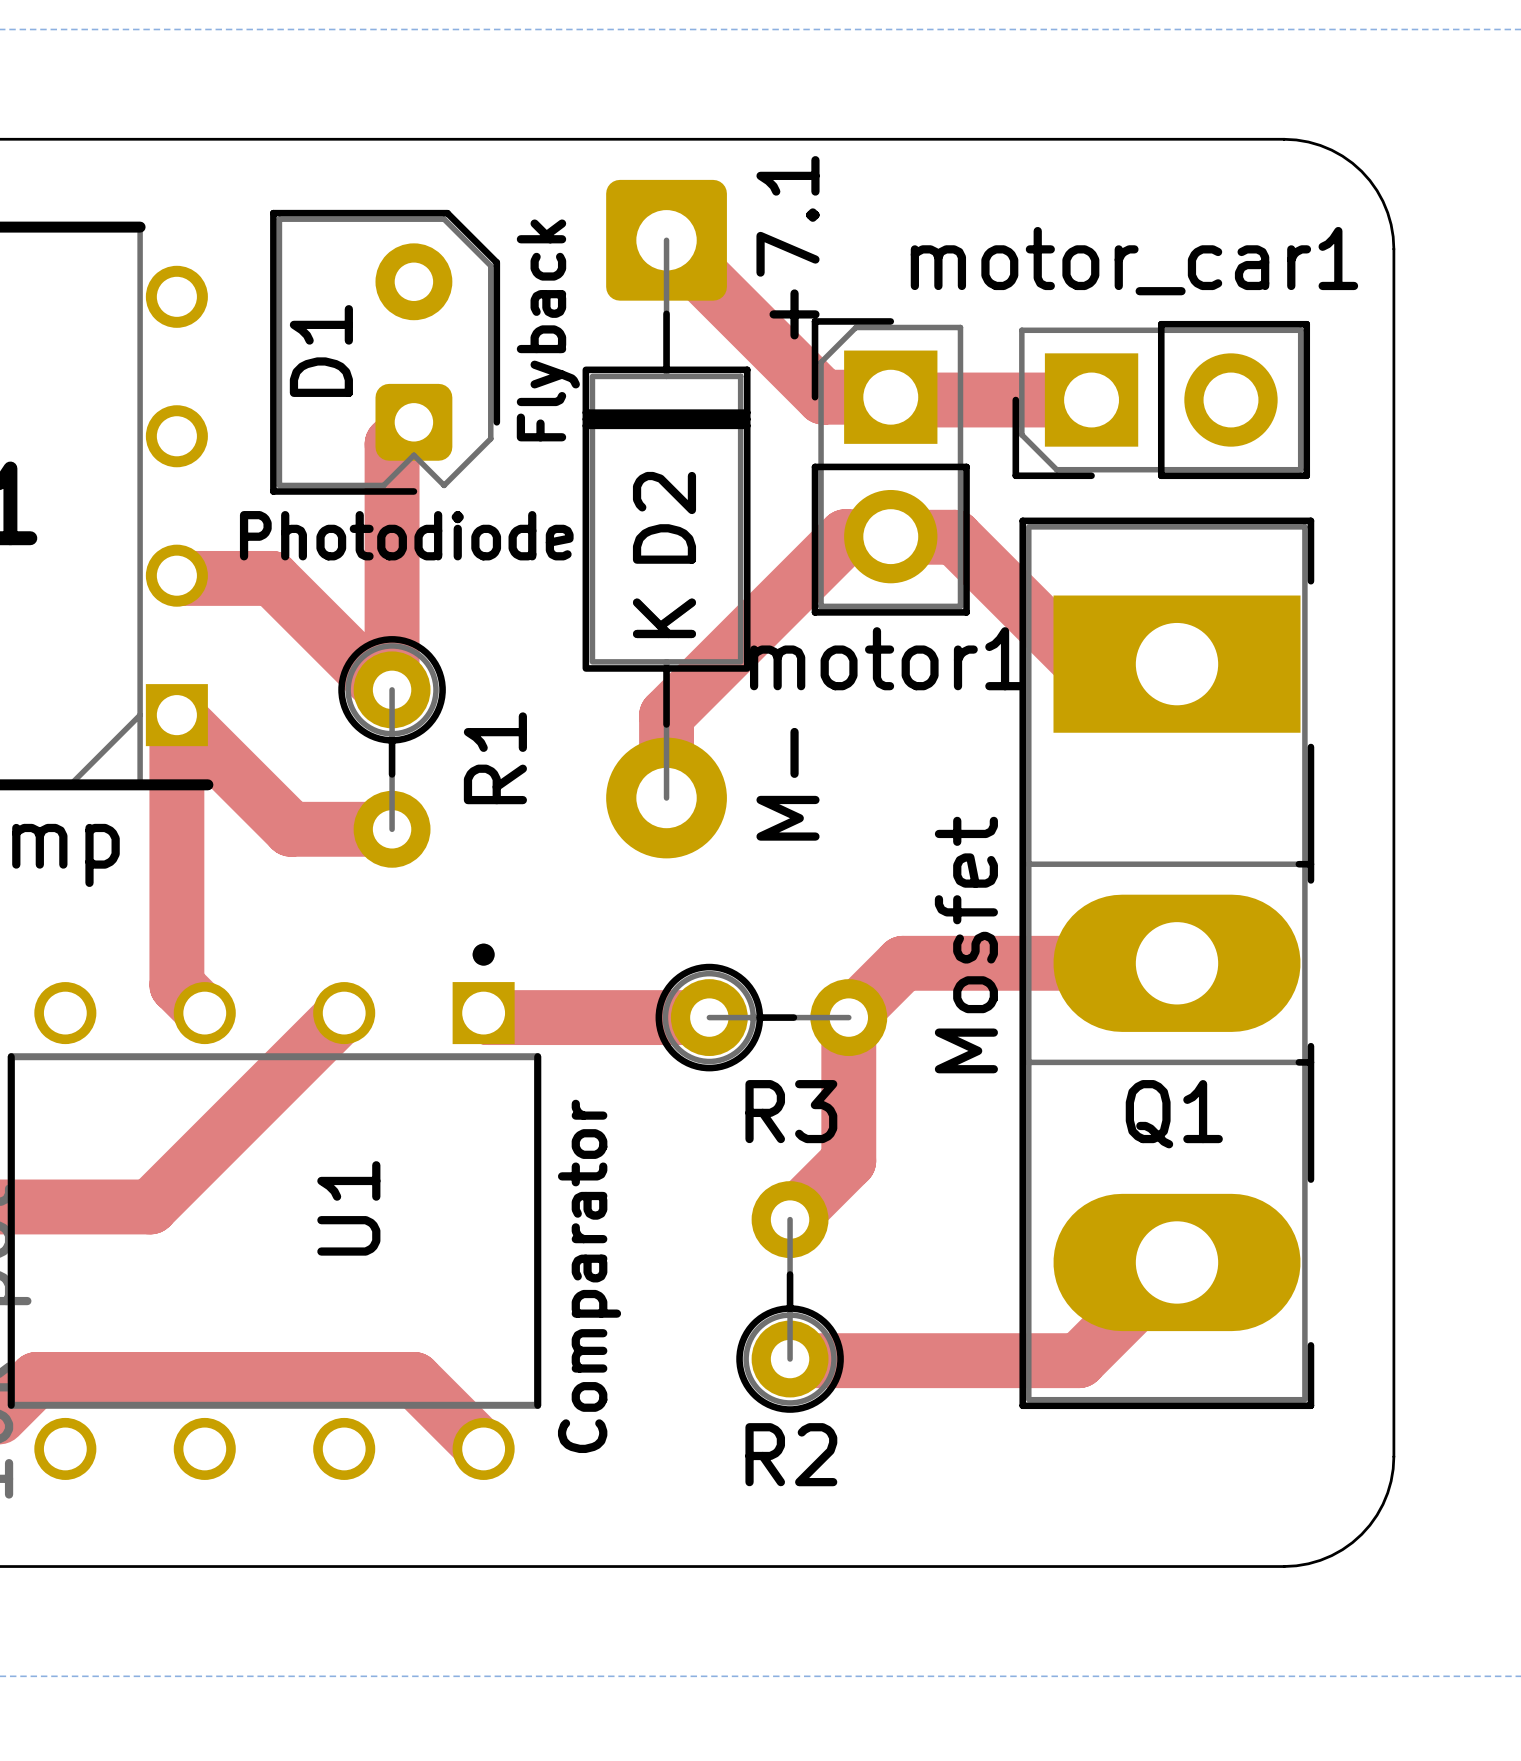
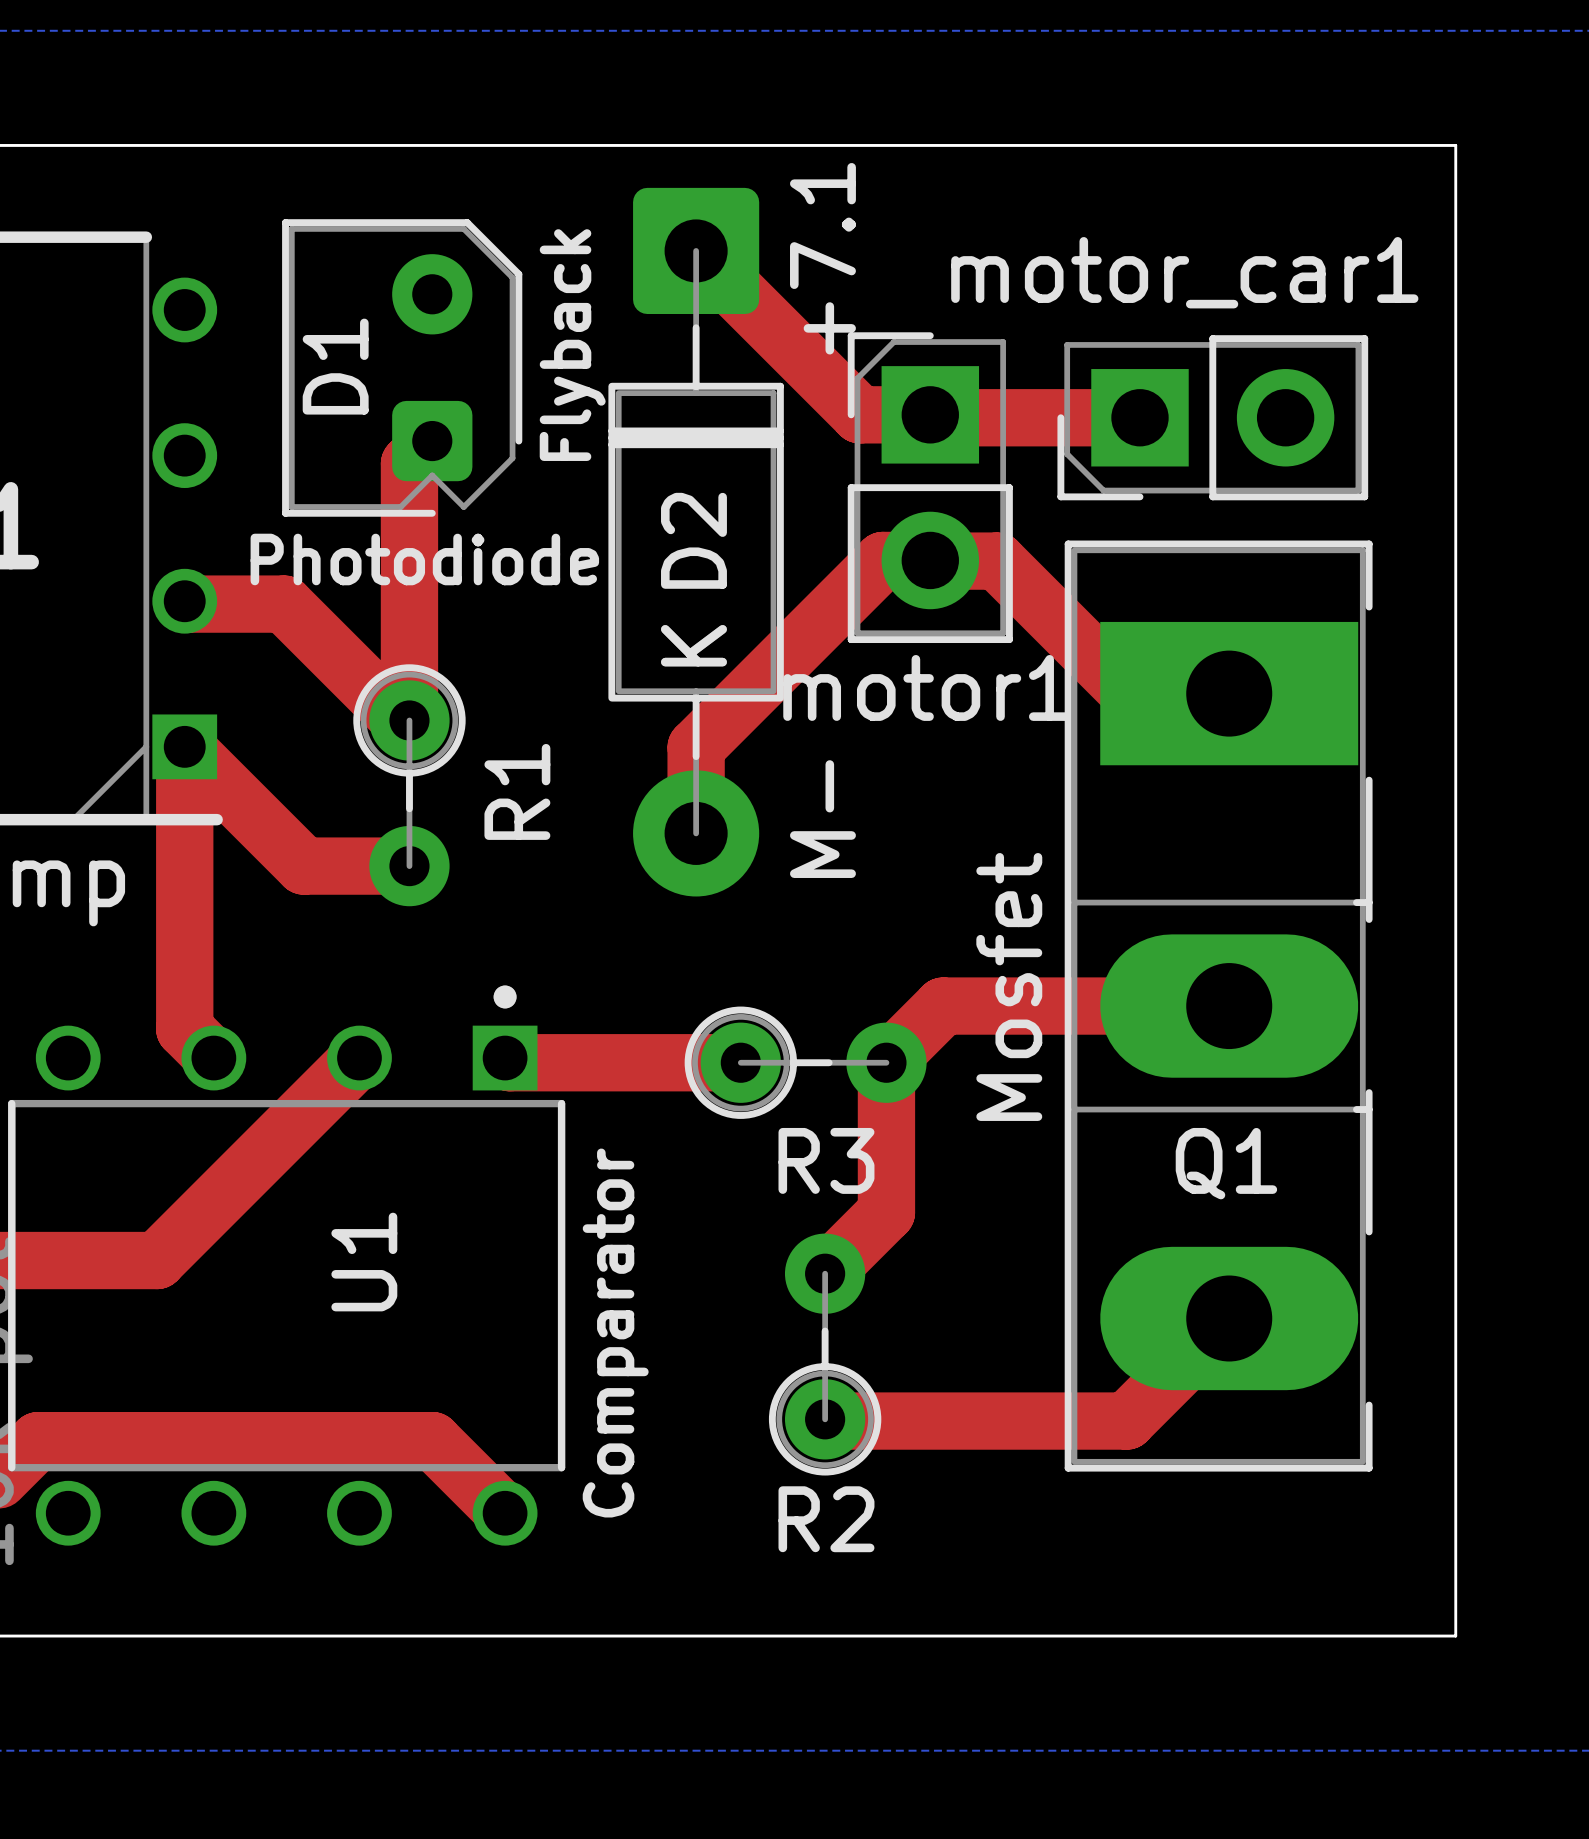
board edge: (1284, 139) (1308, 142) (1331, 150) (1361, 171) (1383, 201) (1391, 224) (1393, 249) -> (1341, 145) (1455, 145) (1455, 260)
board edge: (1393, 1456) (1391, 1481) (1383, 1504) (1361, 1534) (1342, 1549) (1320, 1560) (1284, 1566) -> (1455, 1521) (1455, 1636) (1341, 1636)

